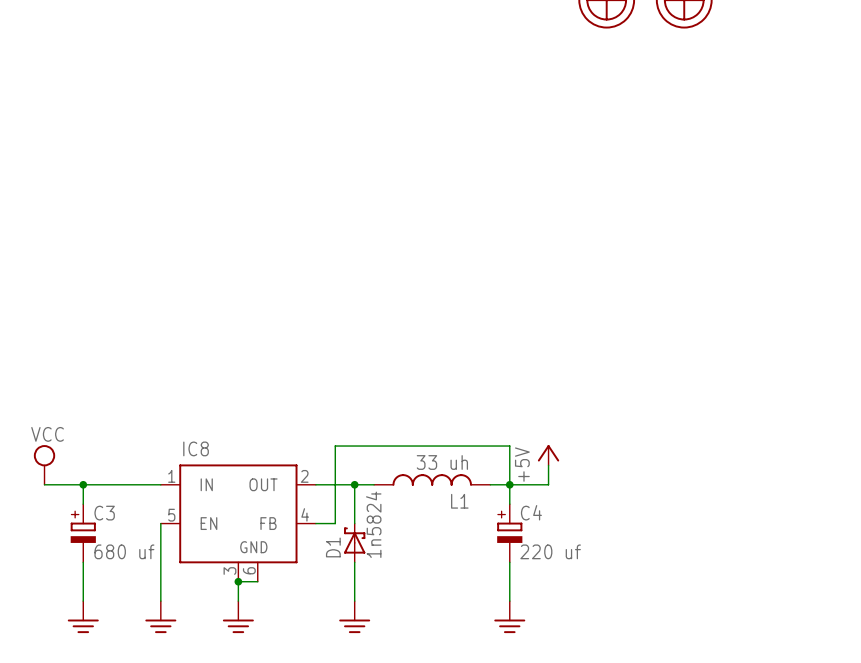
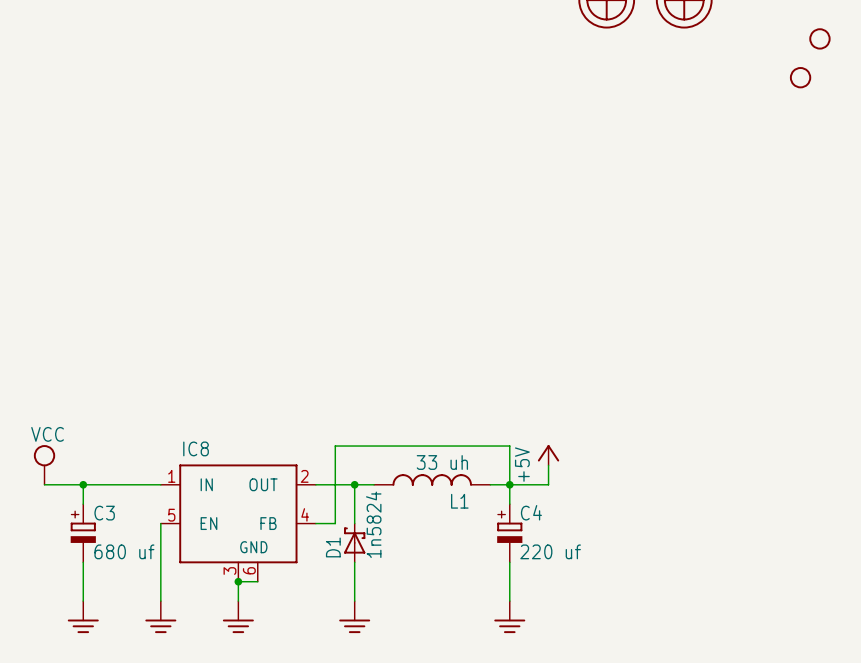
part: none -> (819, 38)
part: none -> (800, 77)

